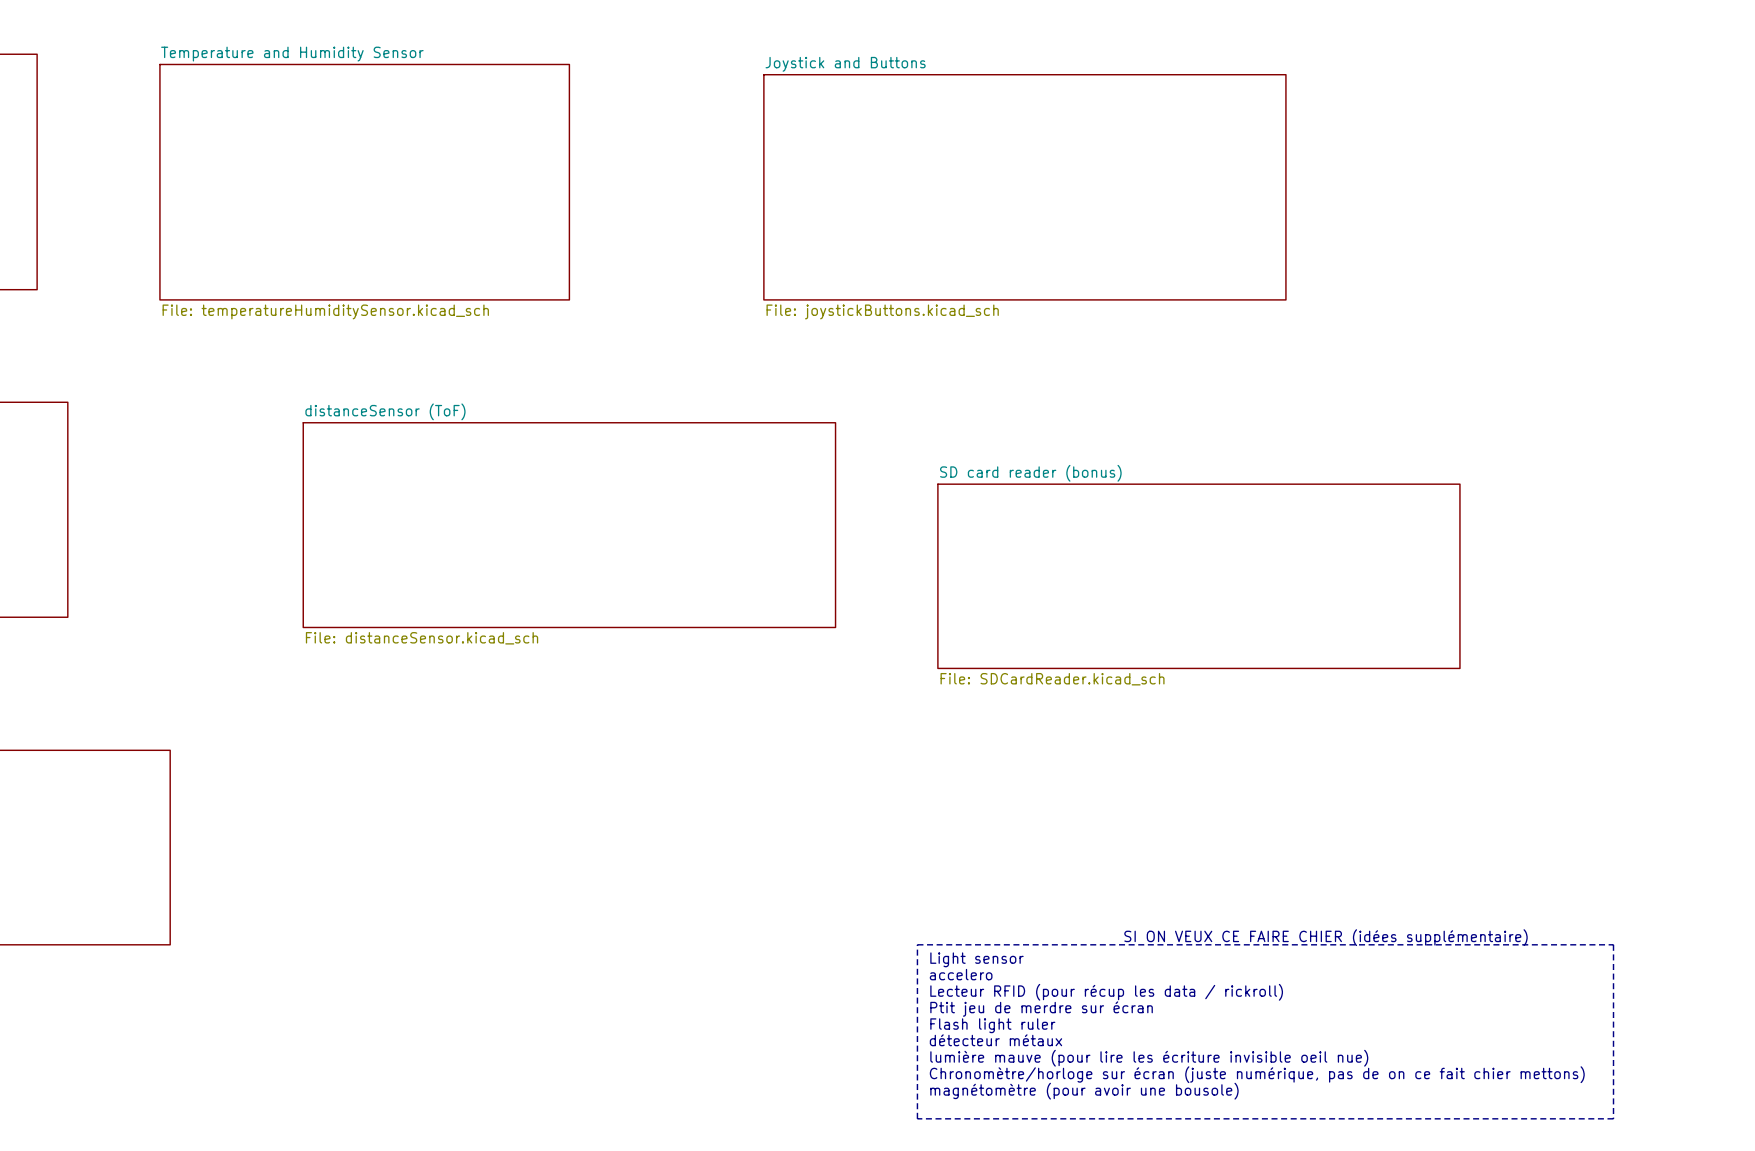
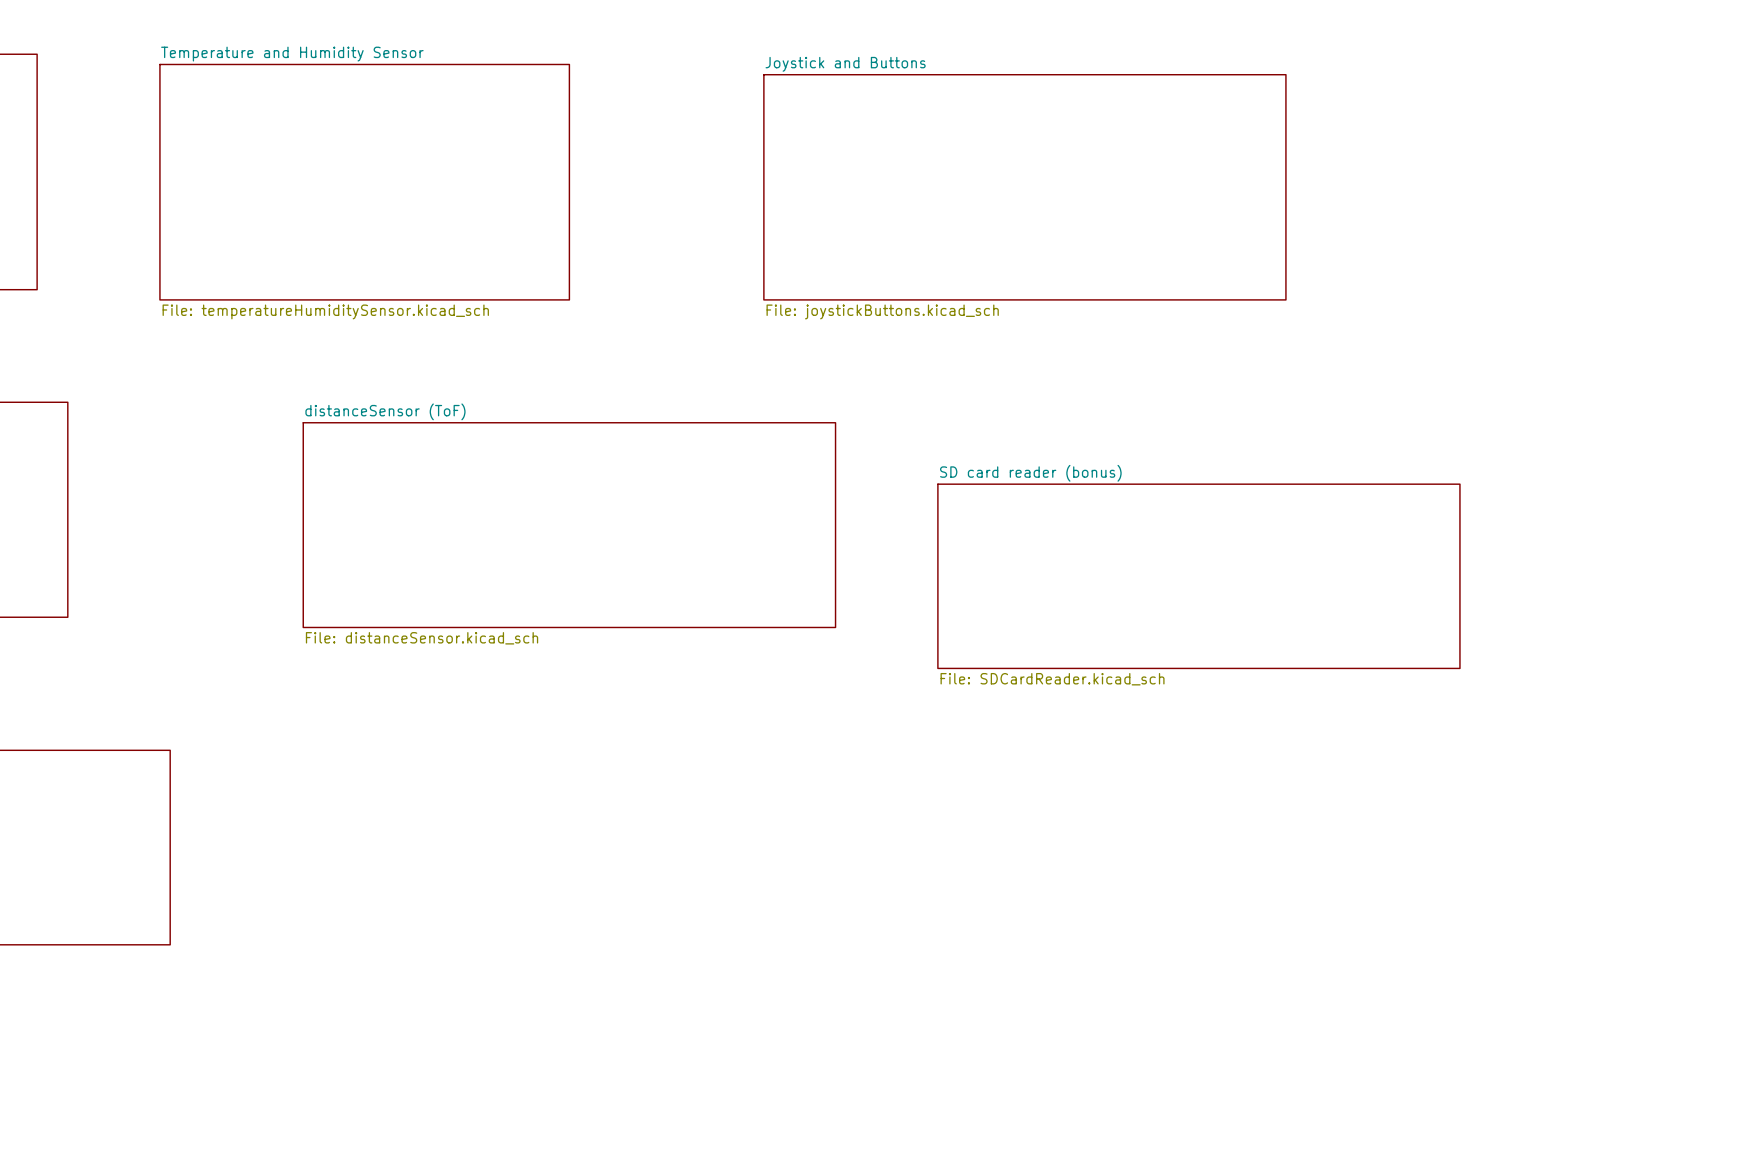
text: SI ON VEUX CE FAIRE CHIER (idées supplémentaire) (1325, 937) -> none
line: (917, 944) (1613, 944) (1613, 1118) (917, 1118) (917, 944) -> none
text: Light sensor (976, 959) -> none
text: accelero (961, 974) -> none
text: Lecteur RFID (pour récup les data / rickroll) (1106, 992) -> none
text: Ptit jeu de merdre sur écran (1041, 1009) -> none
text: Flash light ruler (992, 1025) -> none
text: détecteur métaux (995, 1040) -> none
text: lumière mauve (pour lire les écriture invisible oeil nue) (1149, 1058) -> none
text: Chronomètre/horloge sur écran (juste numérique, pas de on ce fait chier mettons) (1257, 1074) -> none
text: magnétomètre (pour avoir une bousole) (1084, 1091) -> none

